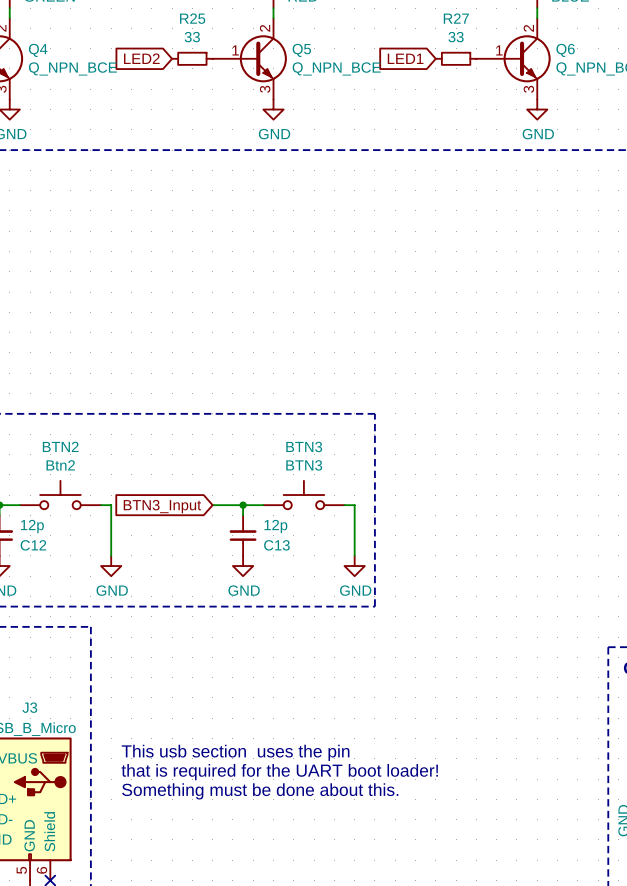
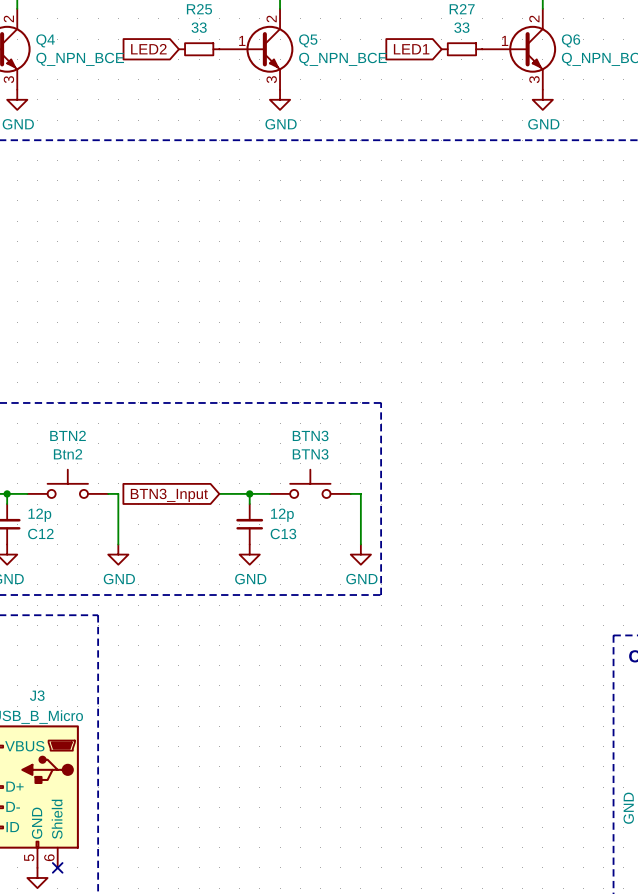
text: This usb section uses the pin (235, 752) -> none
text: that is required for the UART boot loader! (279, 772) -> none
text: Something must be done about this. (260, 791) -> none

